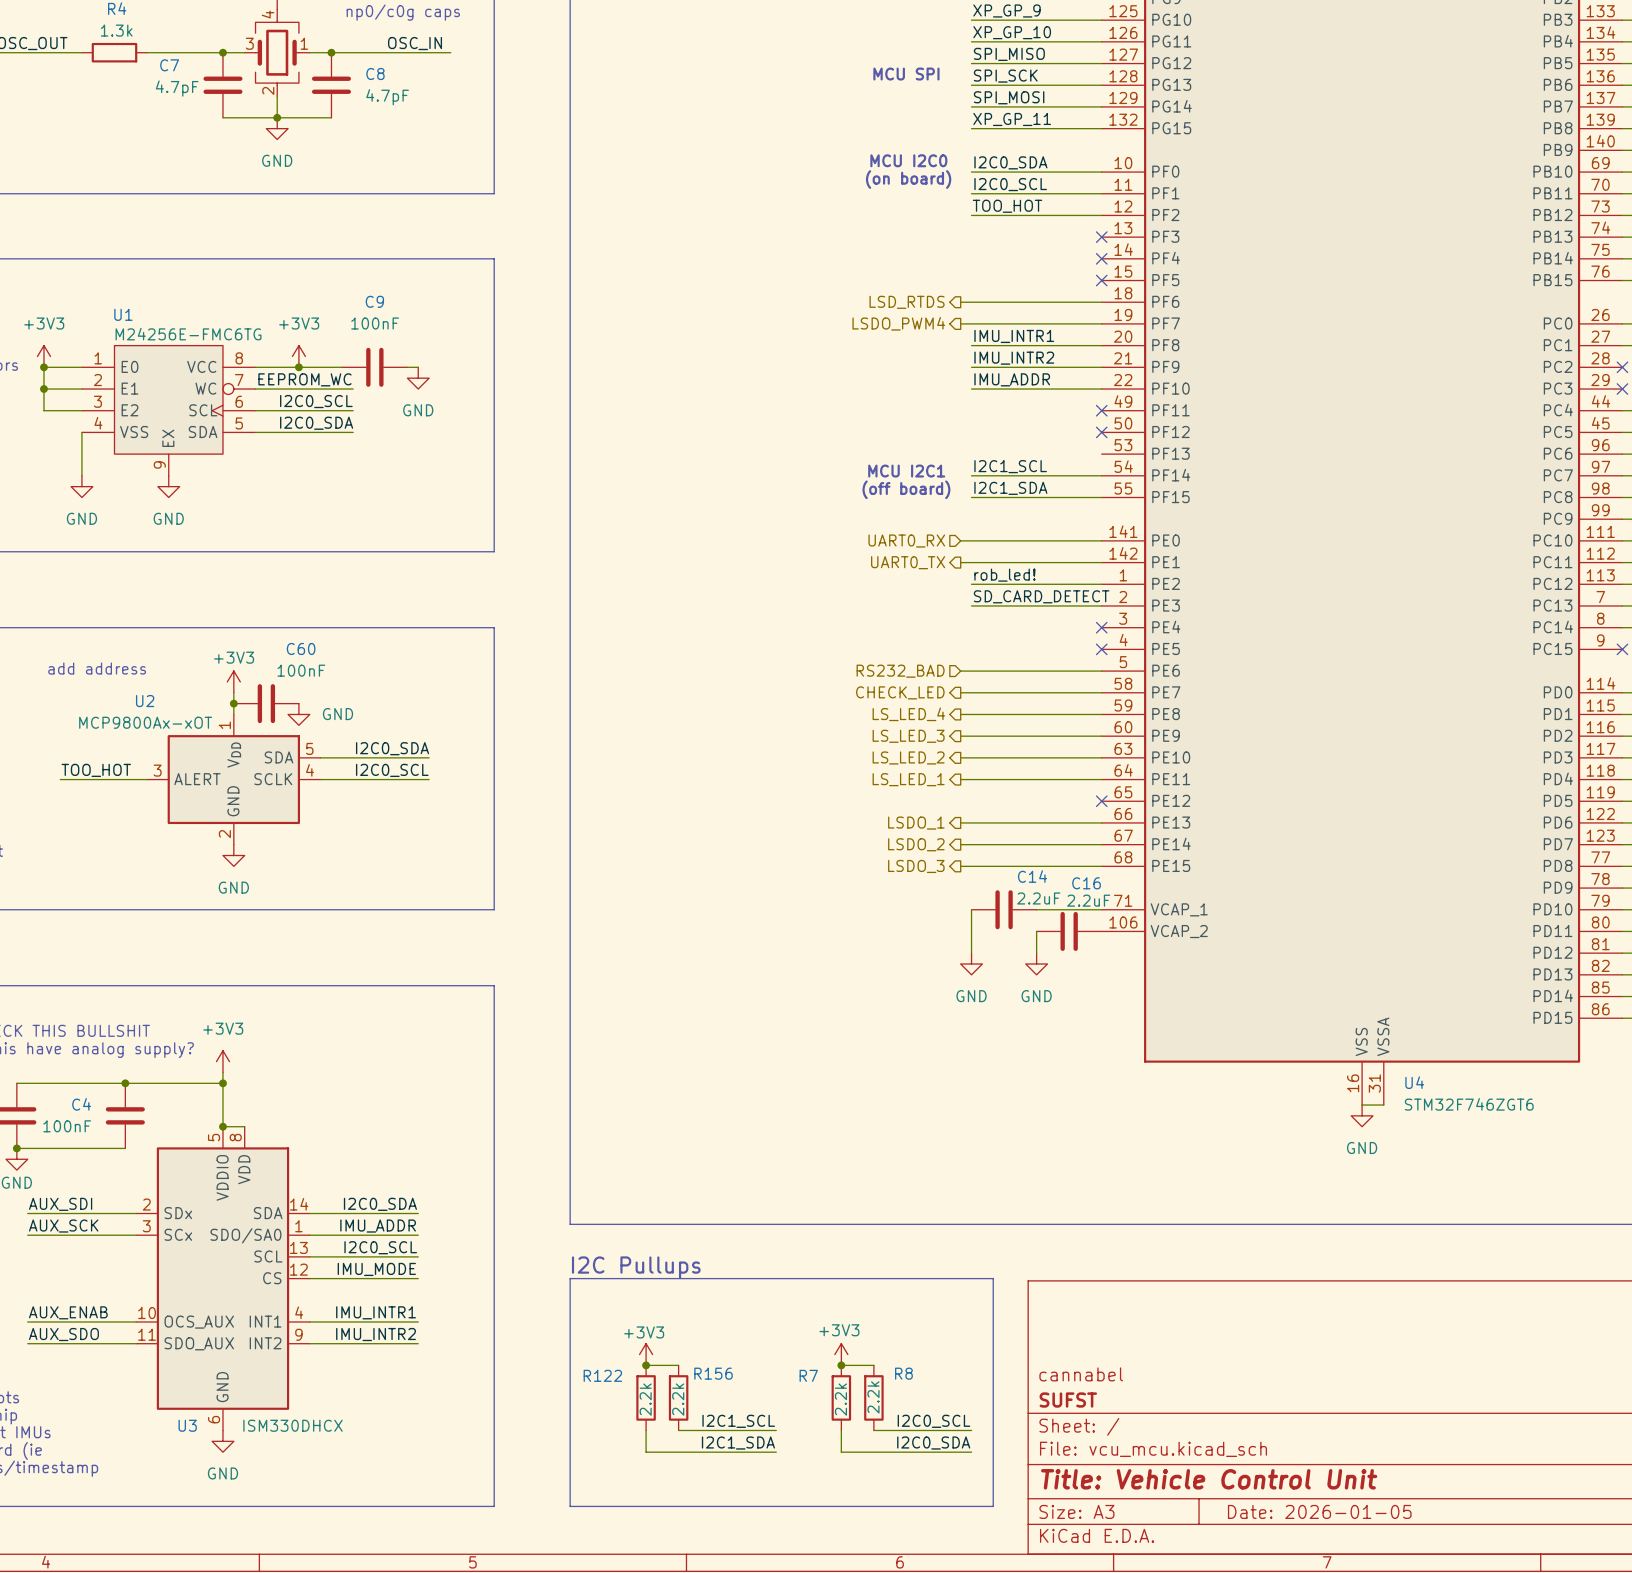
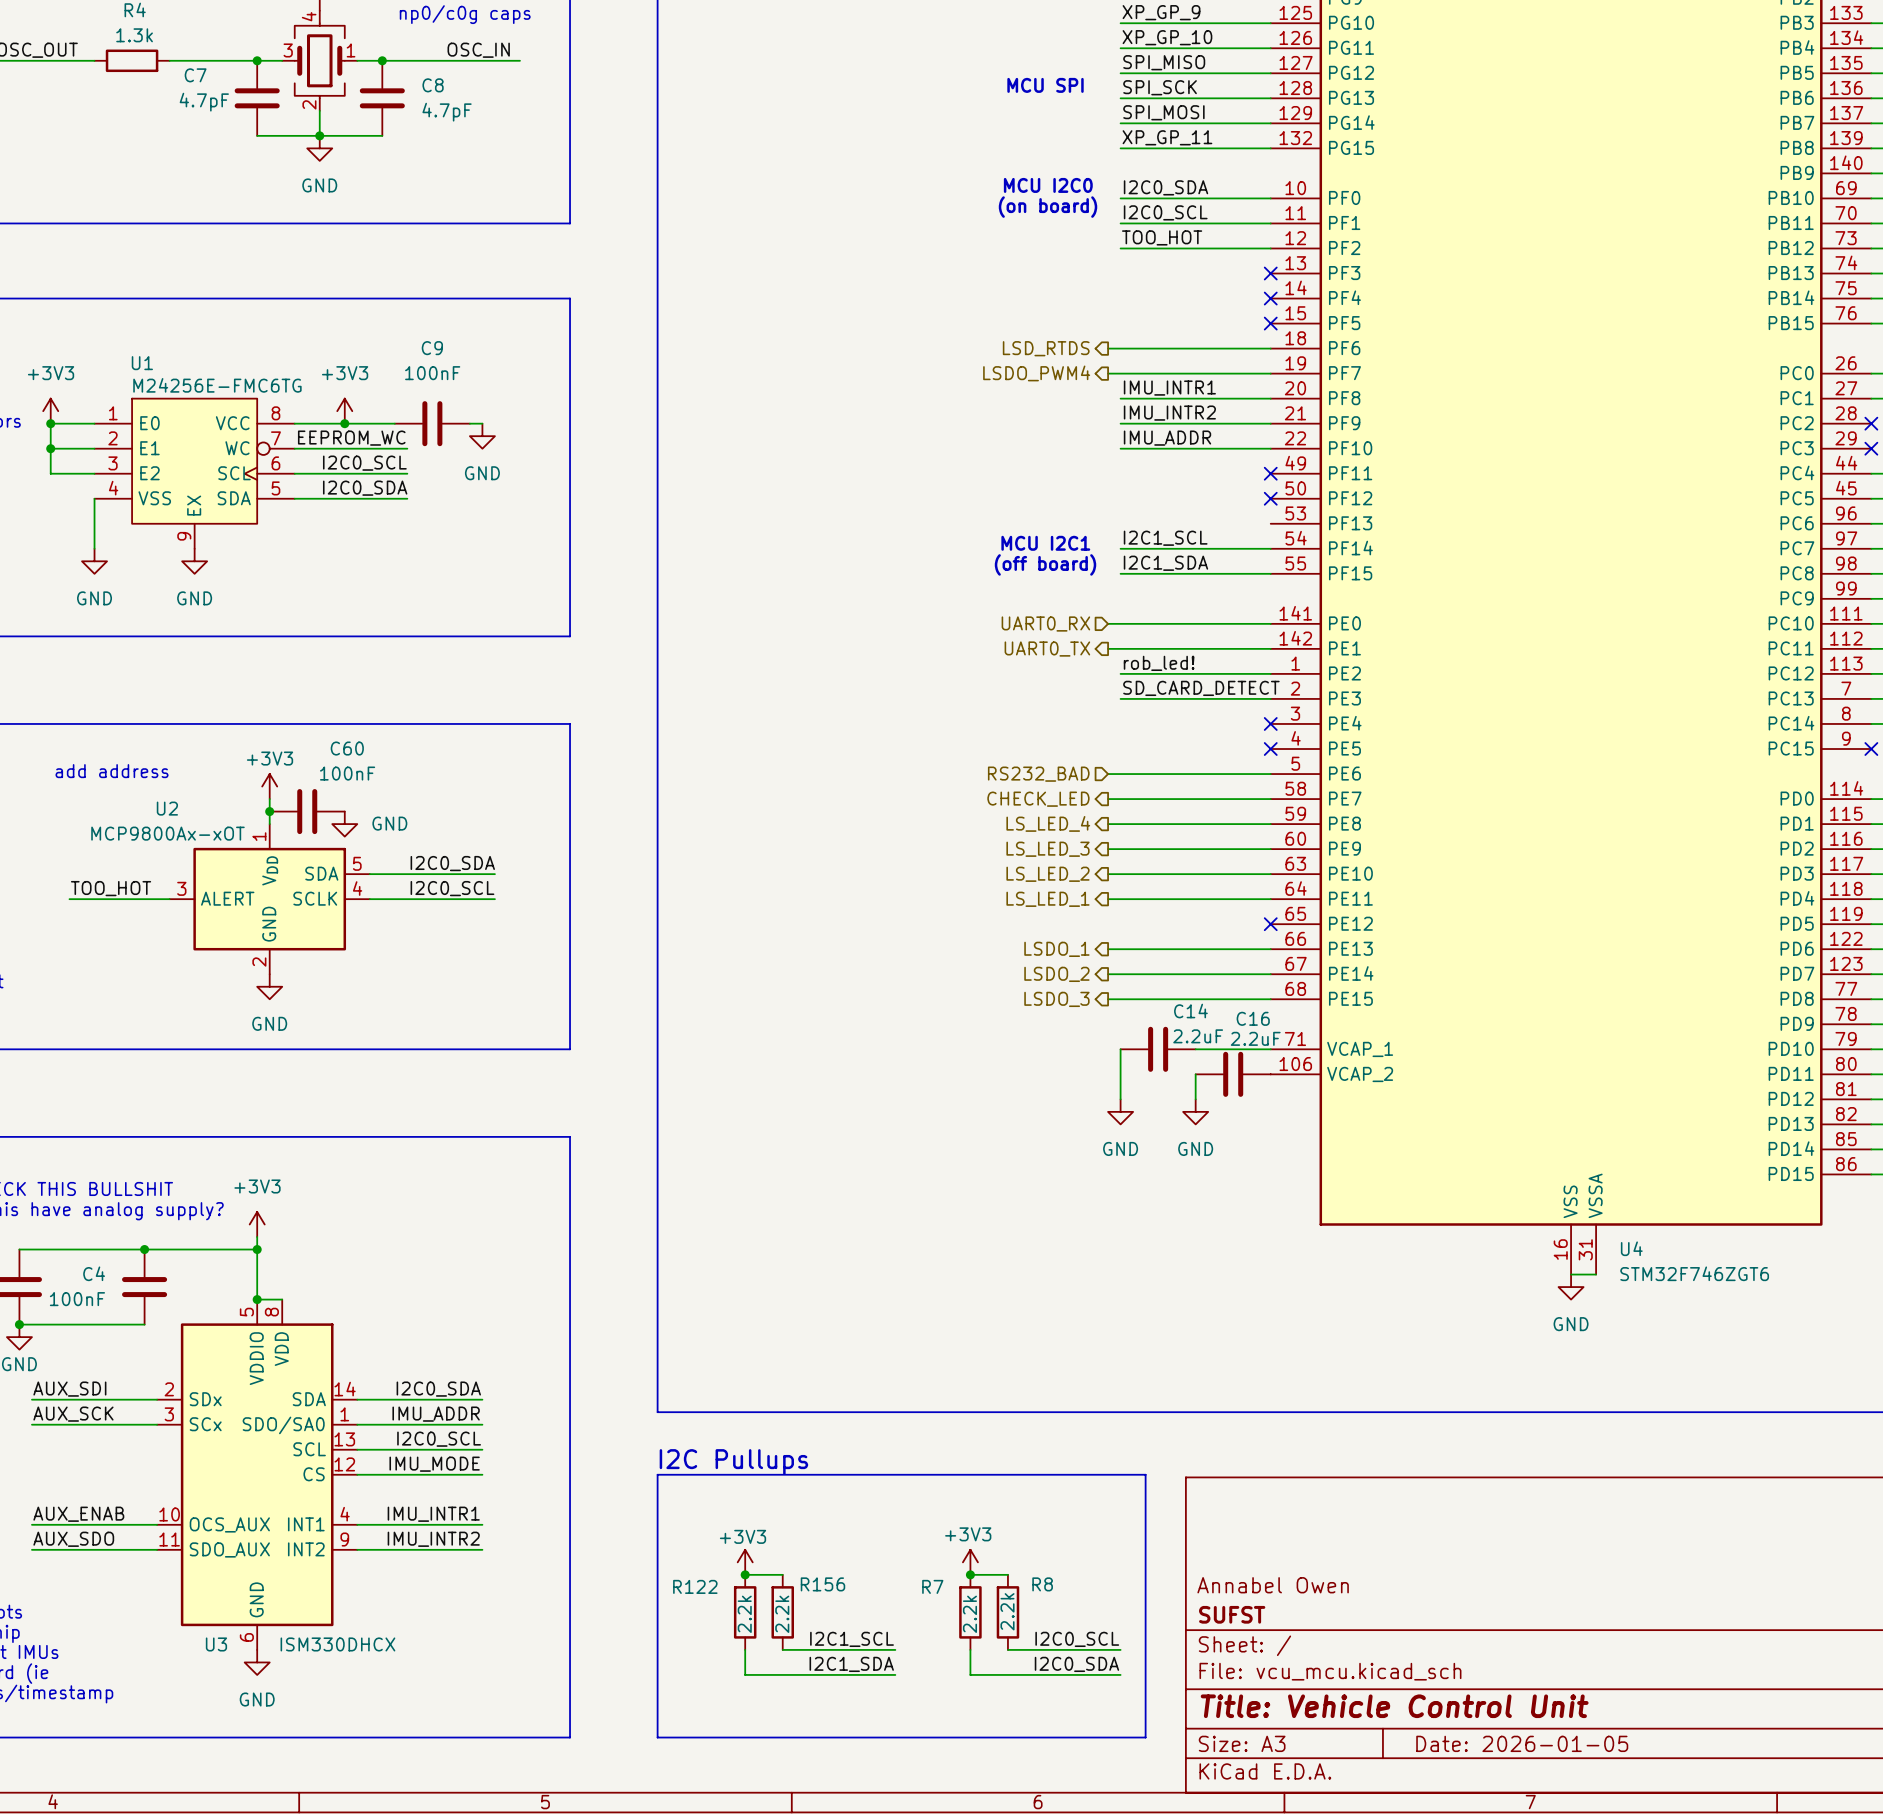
title block: cannabel (1081, 1374) -> Annabel Owen (1273, 1585)

